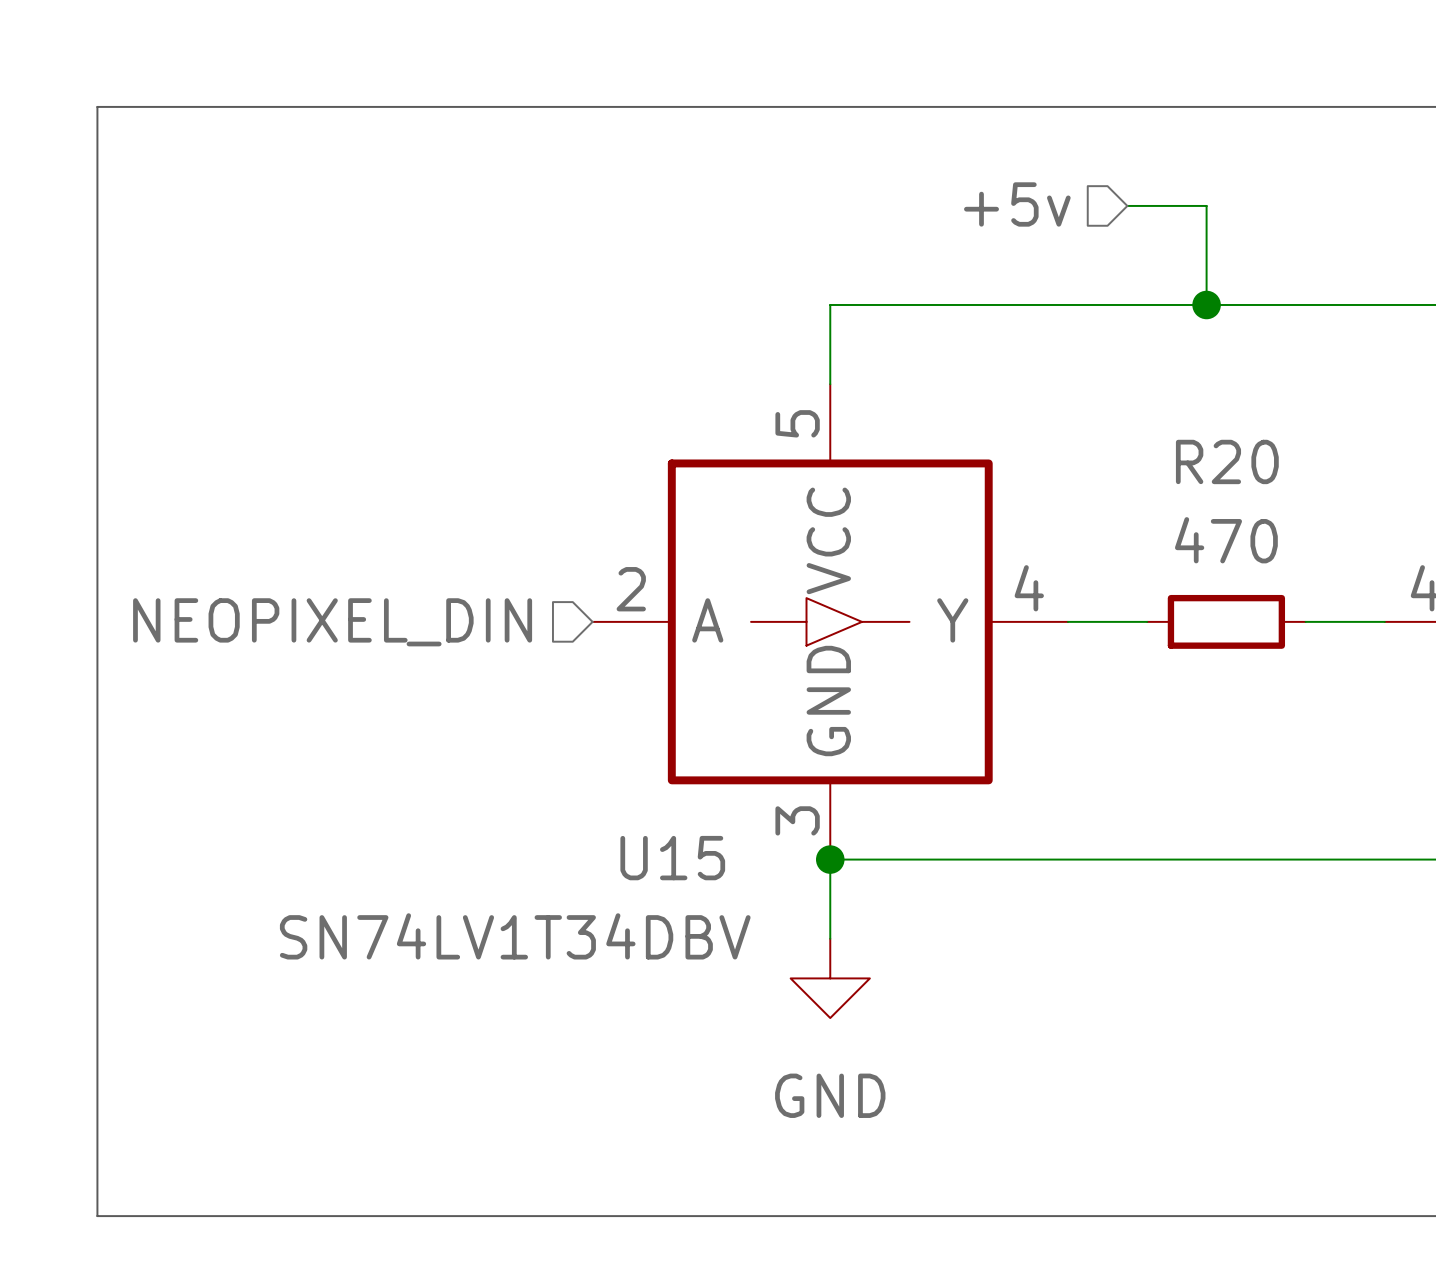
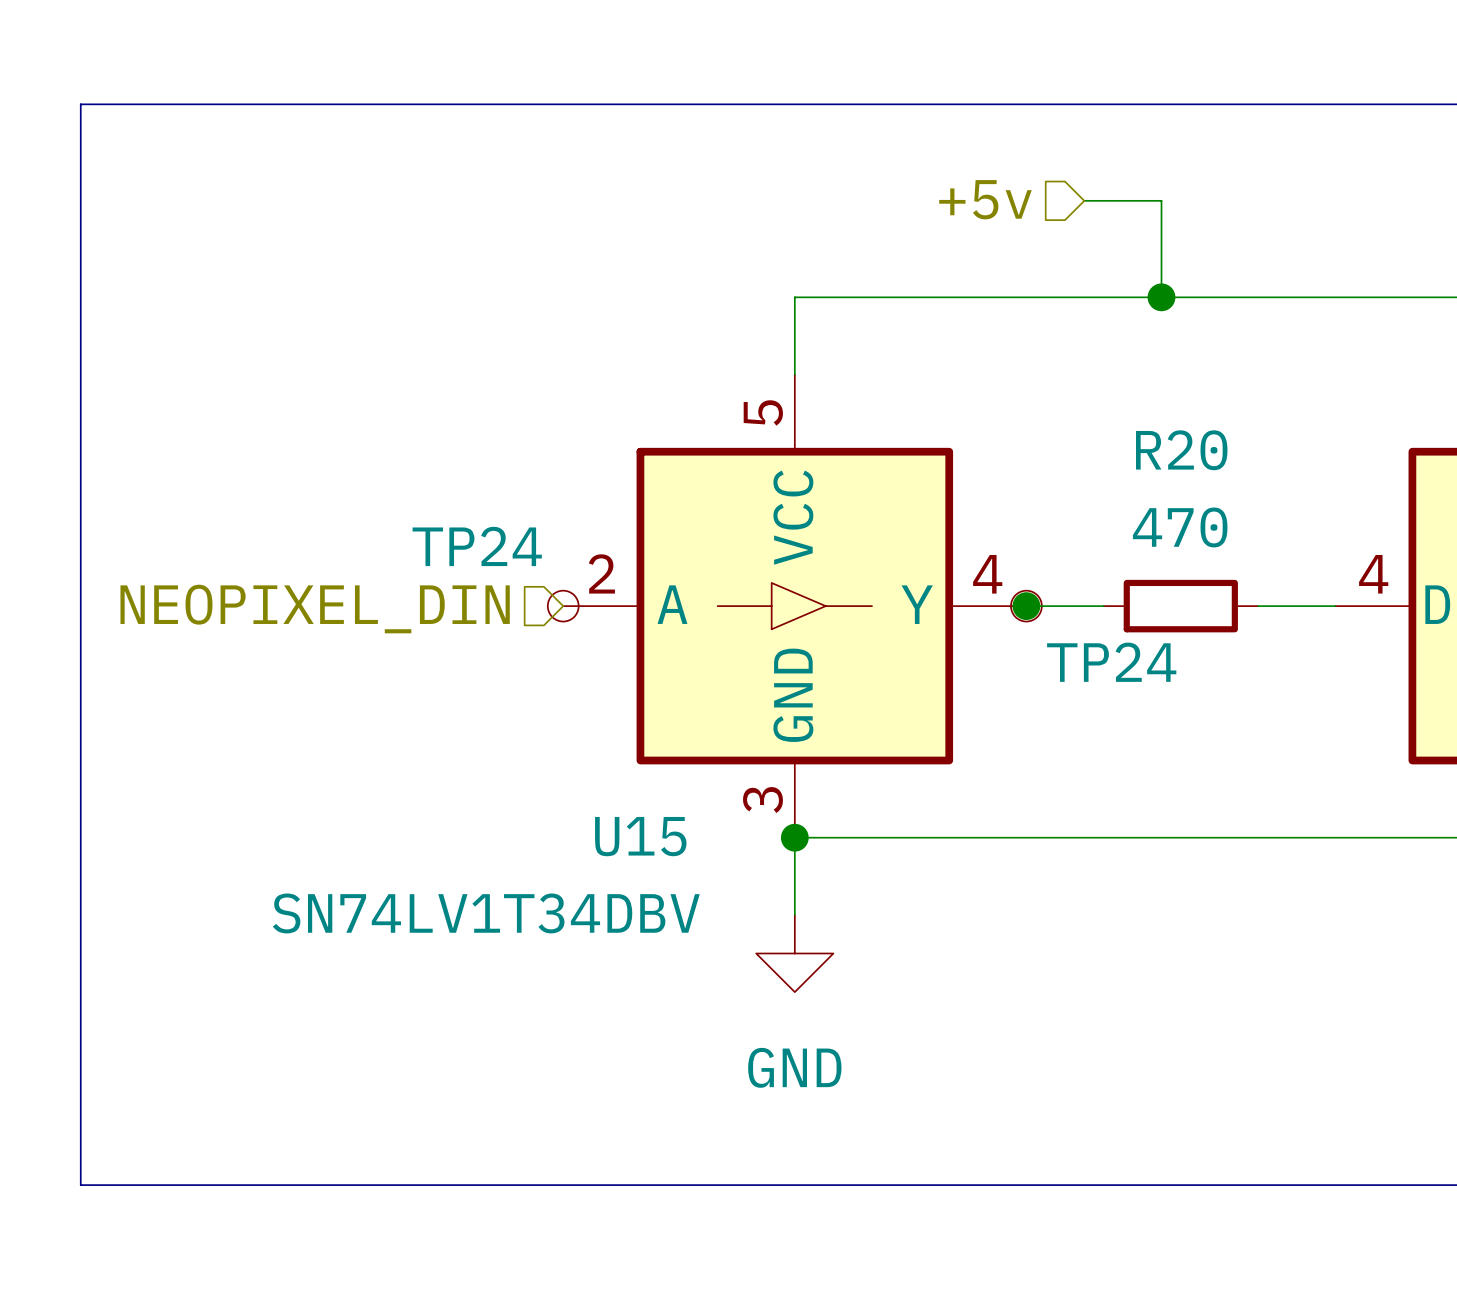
TP24: none -> (563, 606)
TP24: none -> (1026, 606)
junction: none -> (1026, 606)

